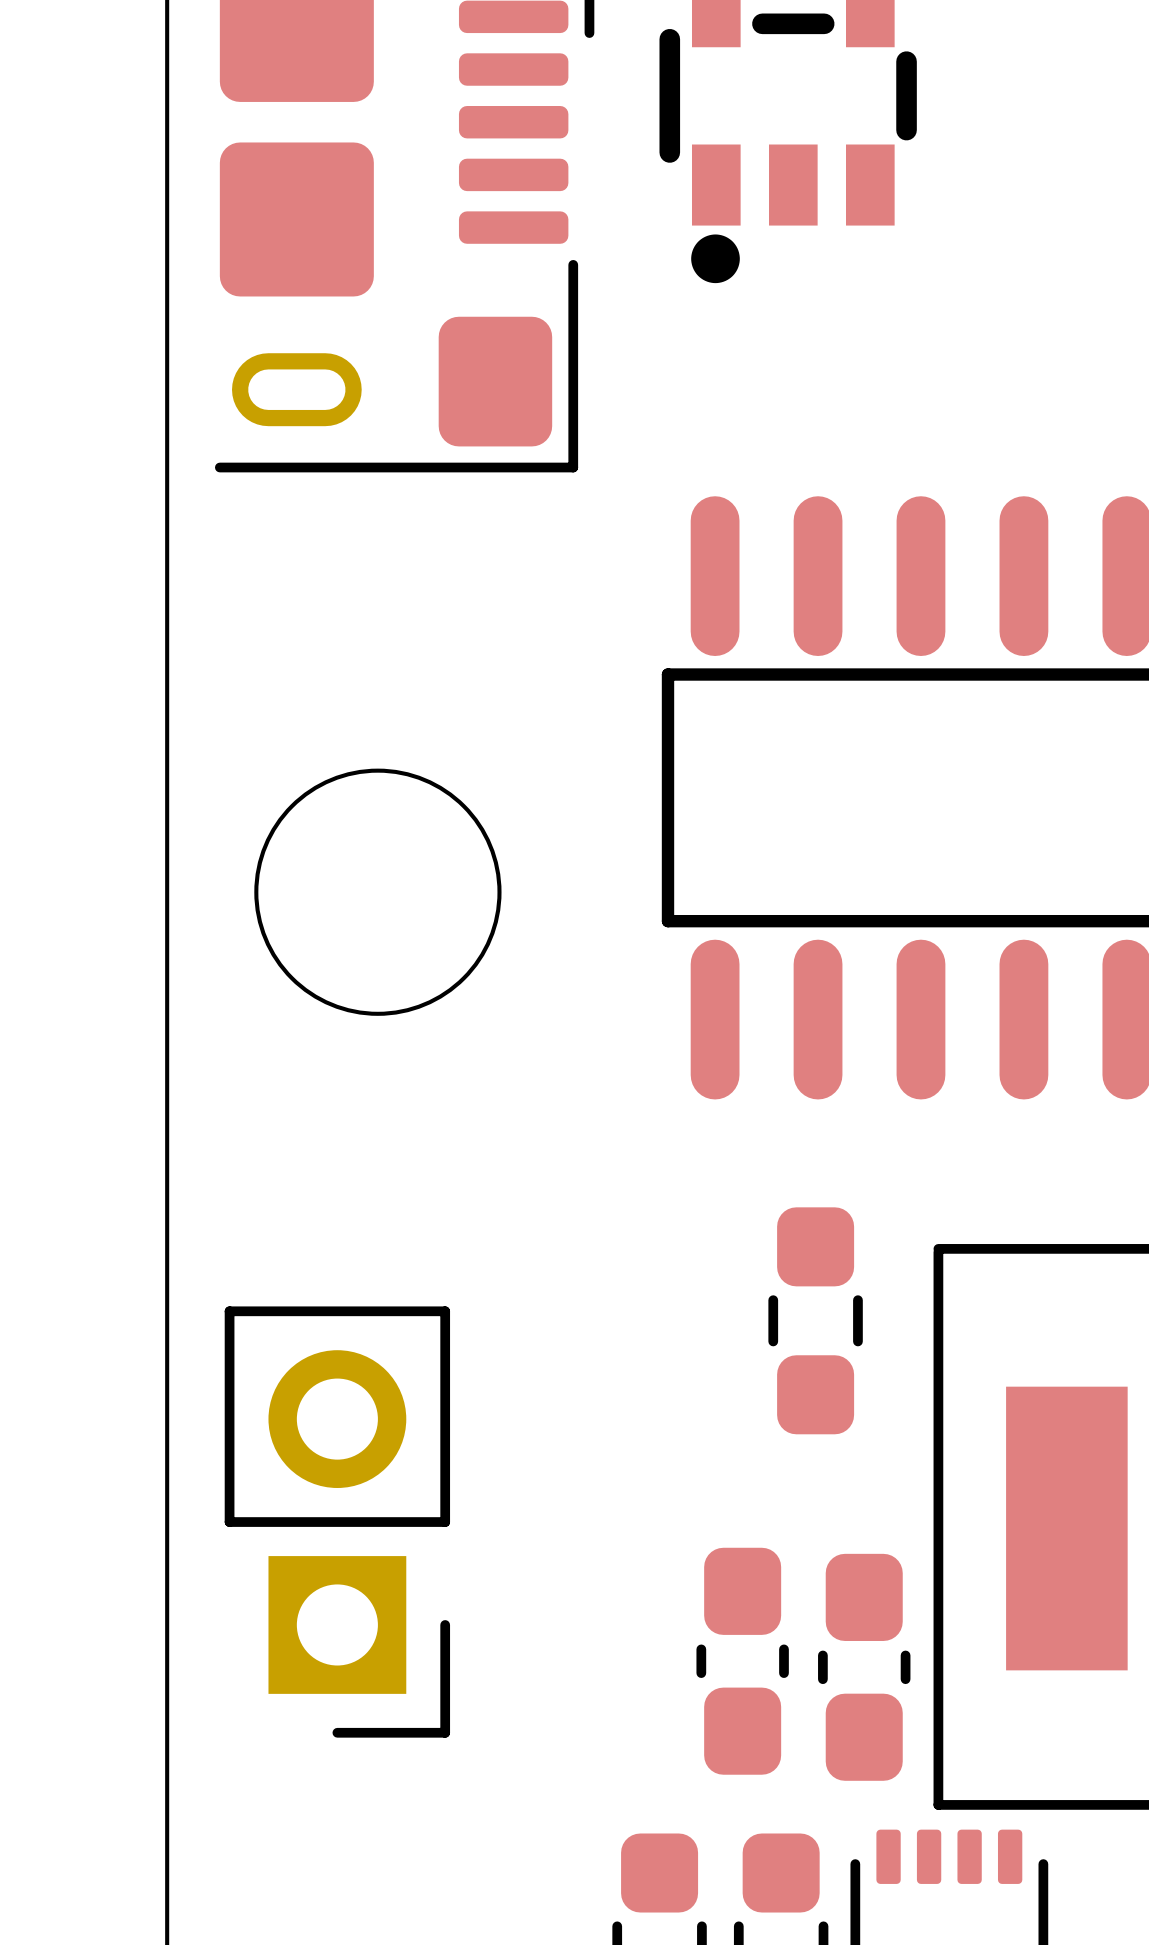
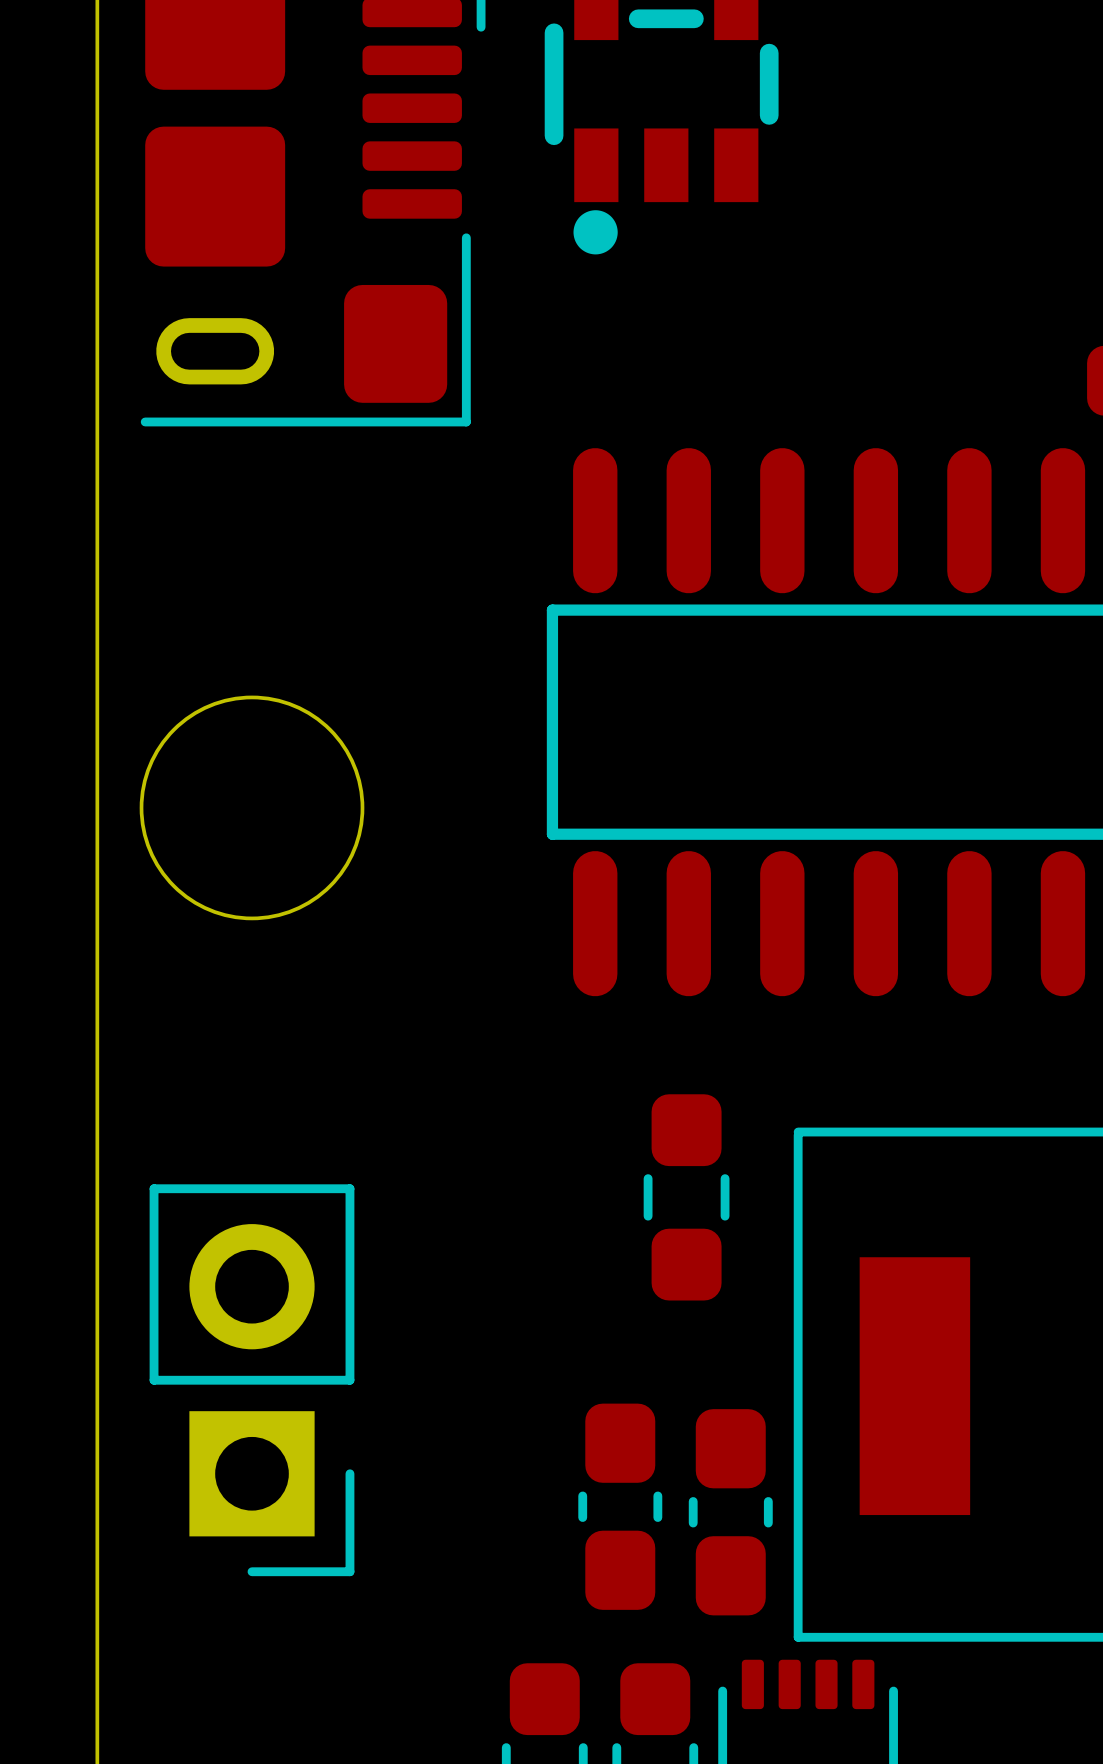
round board edge position: (377, 892) -> (252, 807)

